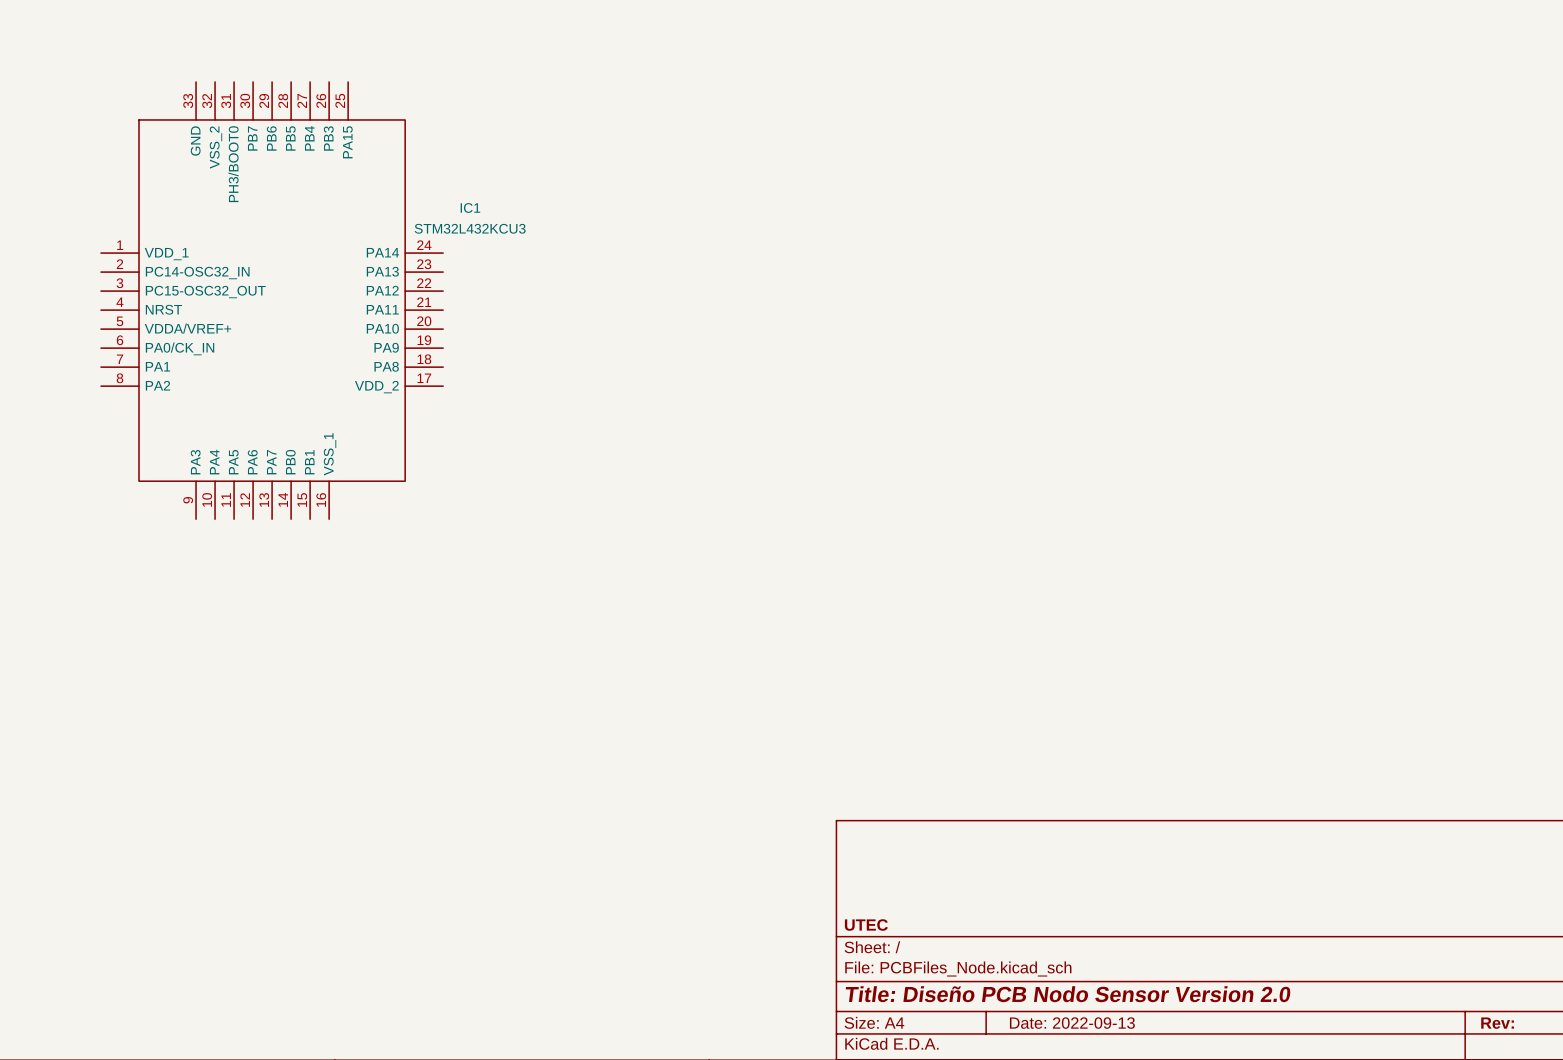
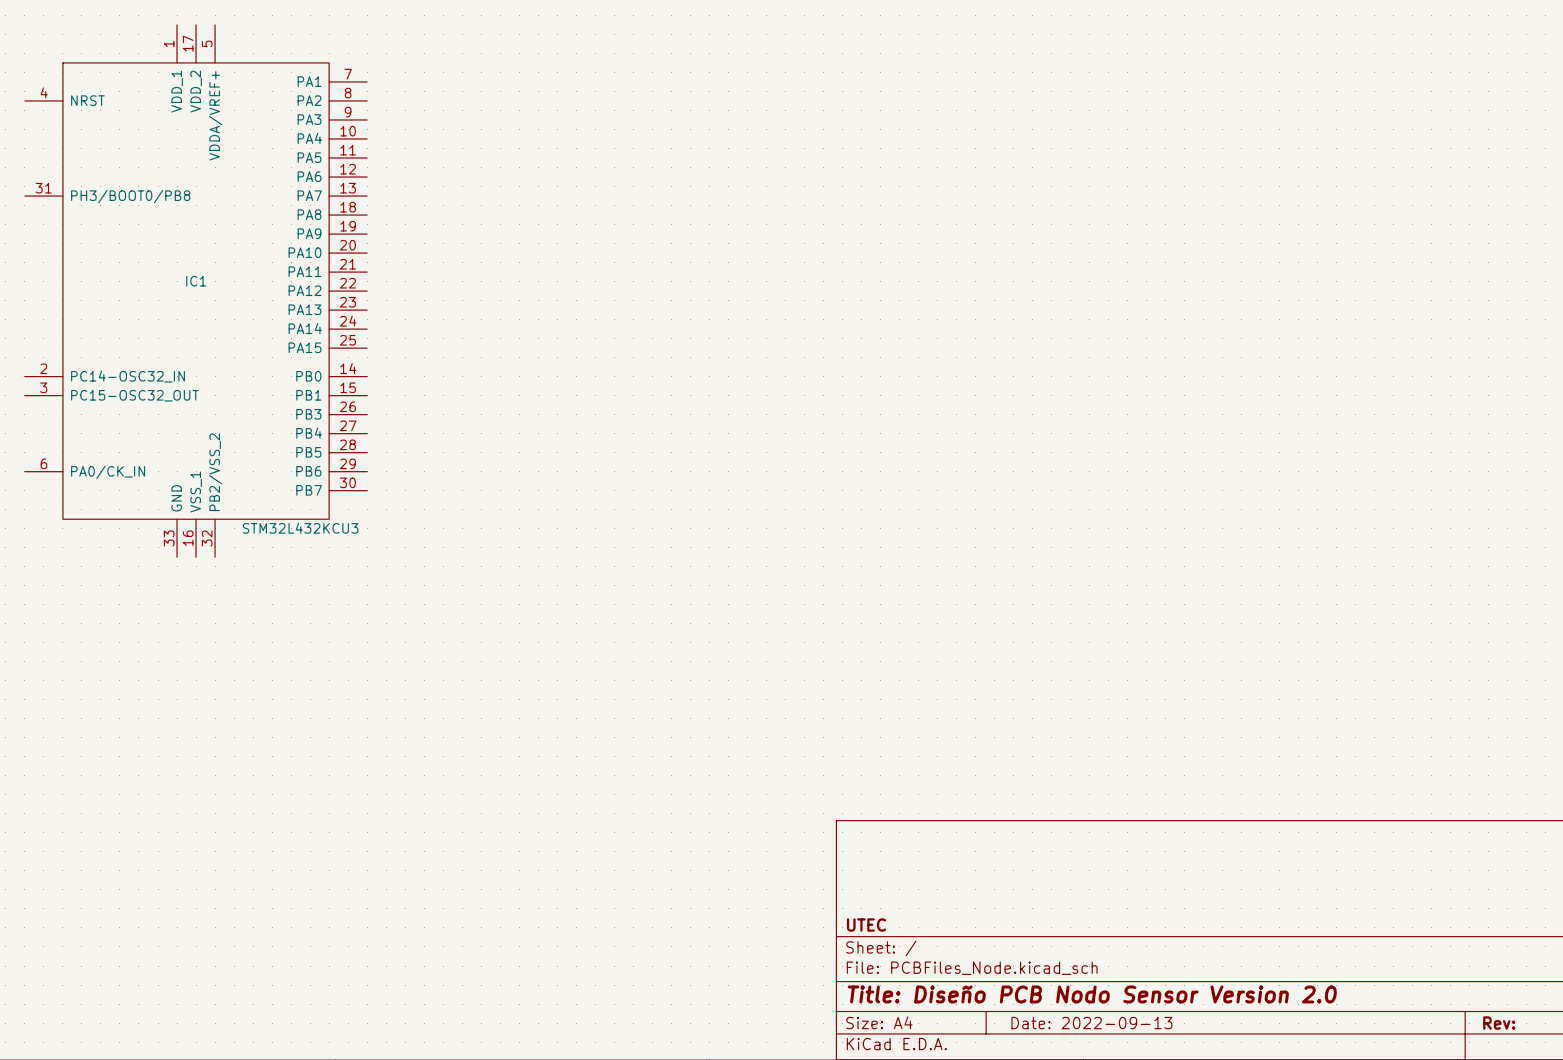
IC1 symbol: [100, 81, 444, 520] -> [24, 24, 368, 558]
IC1 name position: IC1 (470, 207) -> IC1 (196, 281)
IC1 value position: STM32L432KCU3 (470, 228) -> STM32L432KCU3 (300, 528)

